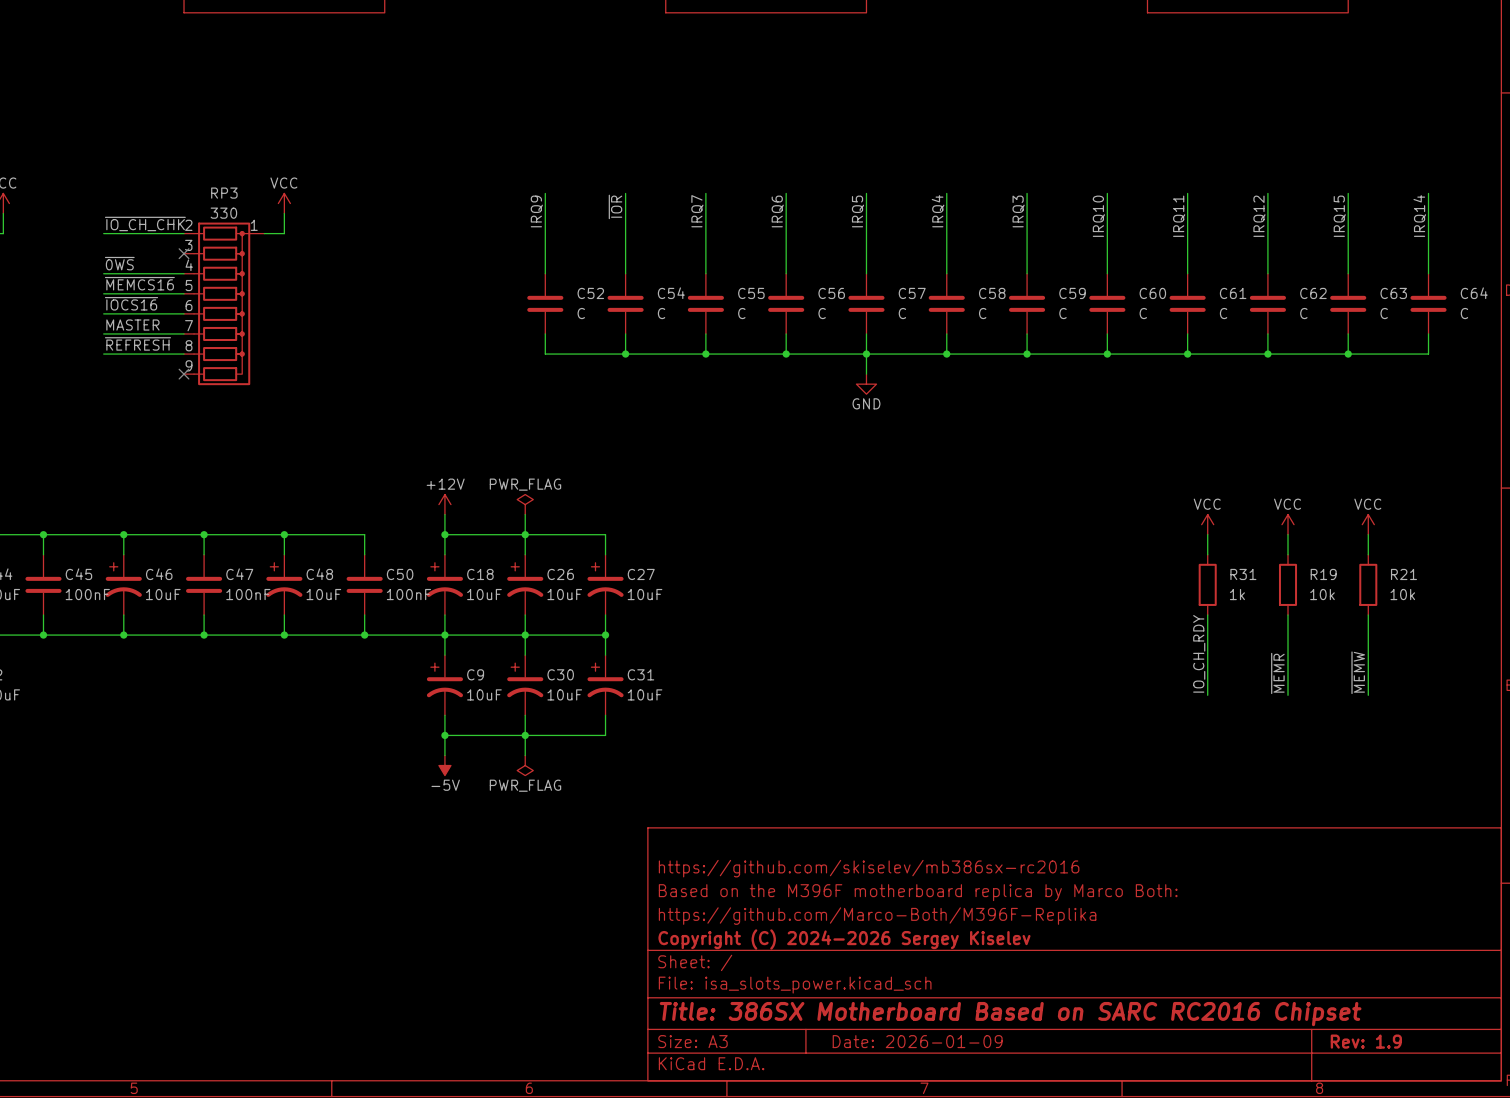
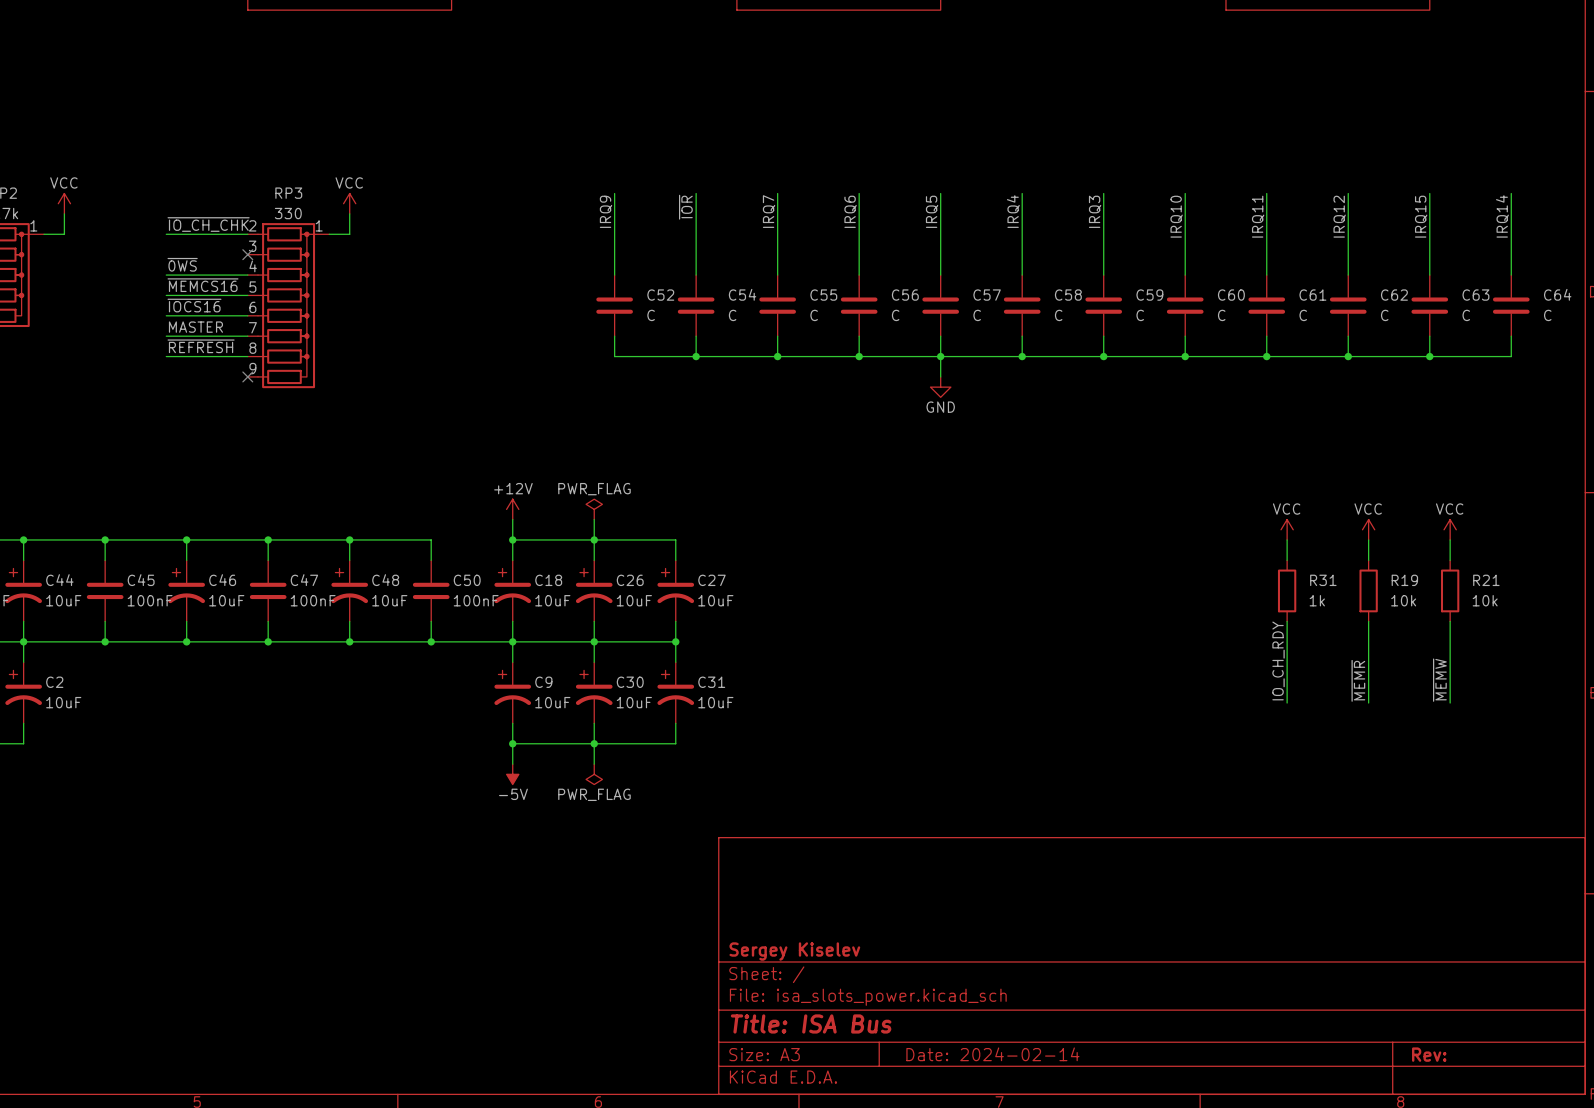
title block: https://github.com/skiselev/mb386sx-rc2016 (869, 868) -> none
title block: Based on the M396F motherboard replica by Marco Both: (918, 892) -> none
title block: https://github.com/Marco-Both/M396F-Replika (877, 916) -> none
title block: Copyright (C) 2024-2026 Sergey Kiselev (844, 939) -> Sergey Kiselev (794, 951)
title block: Title: 386SX Motherboard Based on SARC RC2016 Chipset (1010, 1014) -> Title: ISA Bus (811, 1023)
title block: Date: 2026-01-09 (917, 1041) -> Date: 2024-02-14 (992, 1054)
title block: Rev: 1.9 (1366, 1041) -> Rev: (1429, 1054)

